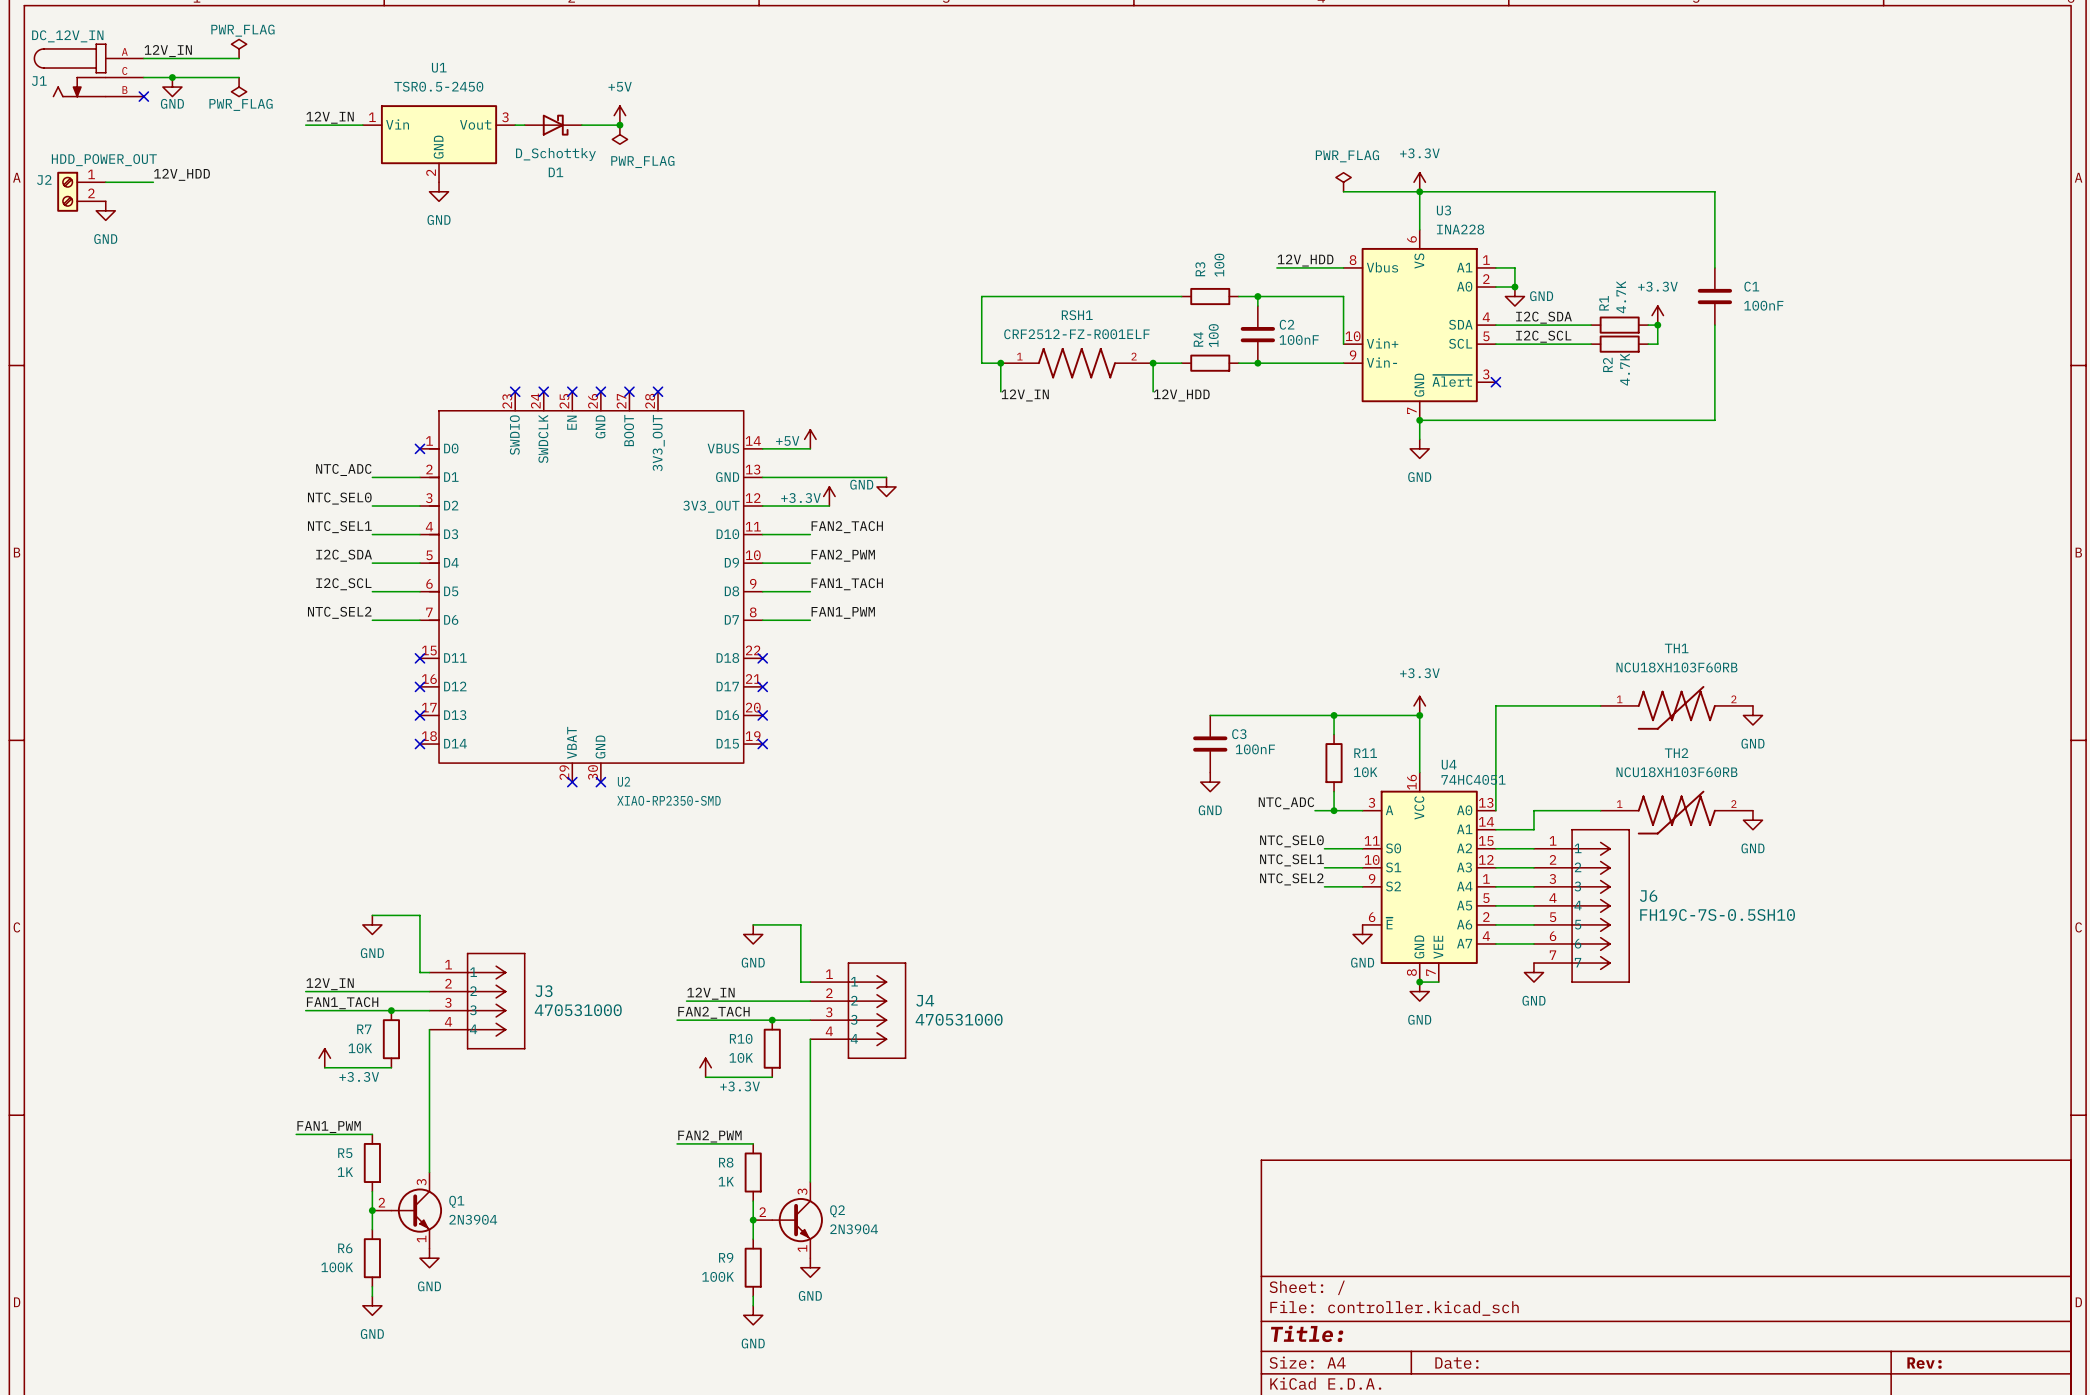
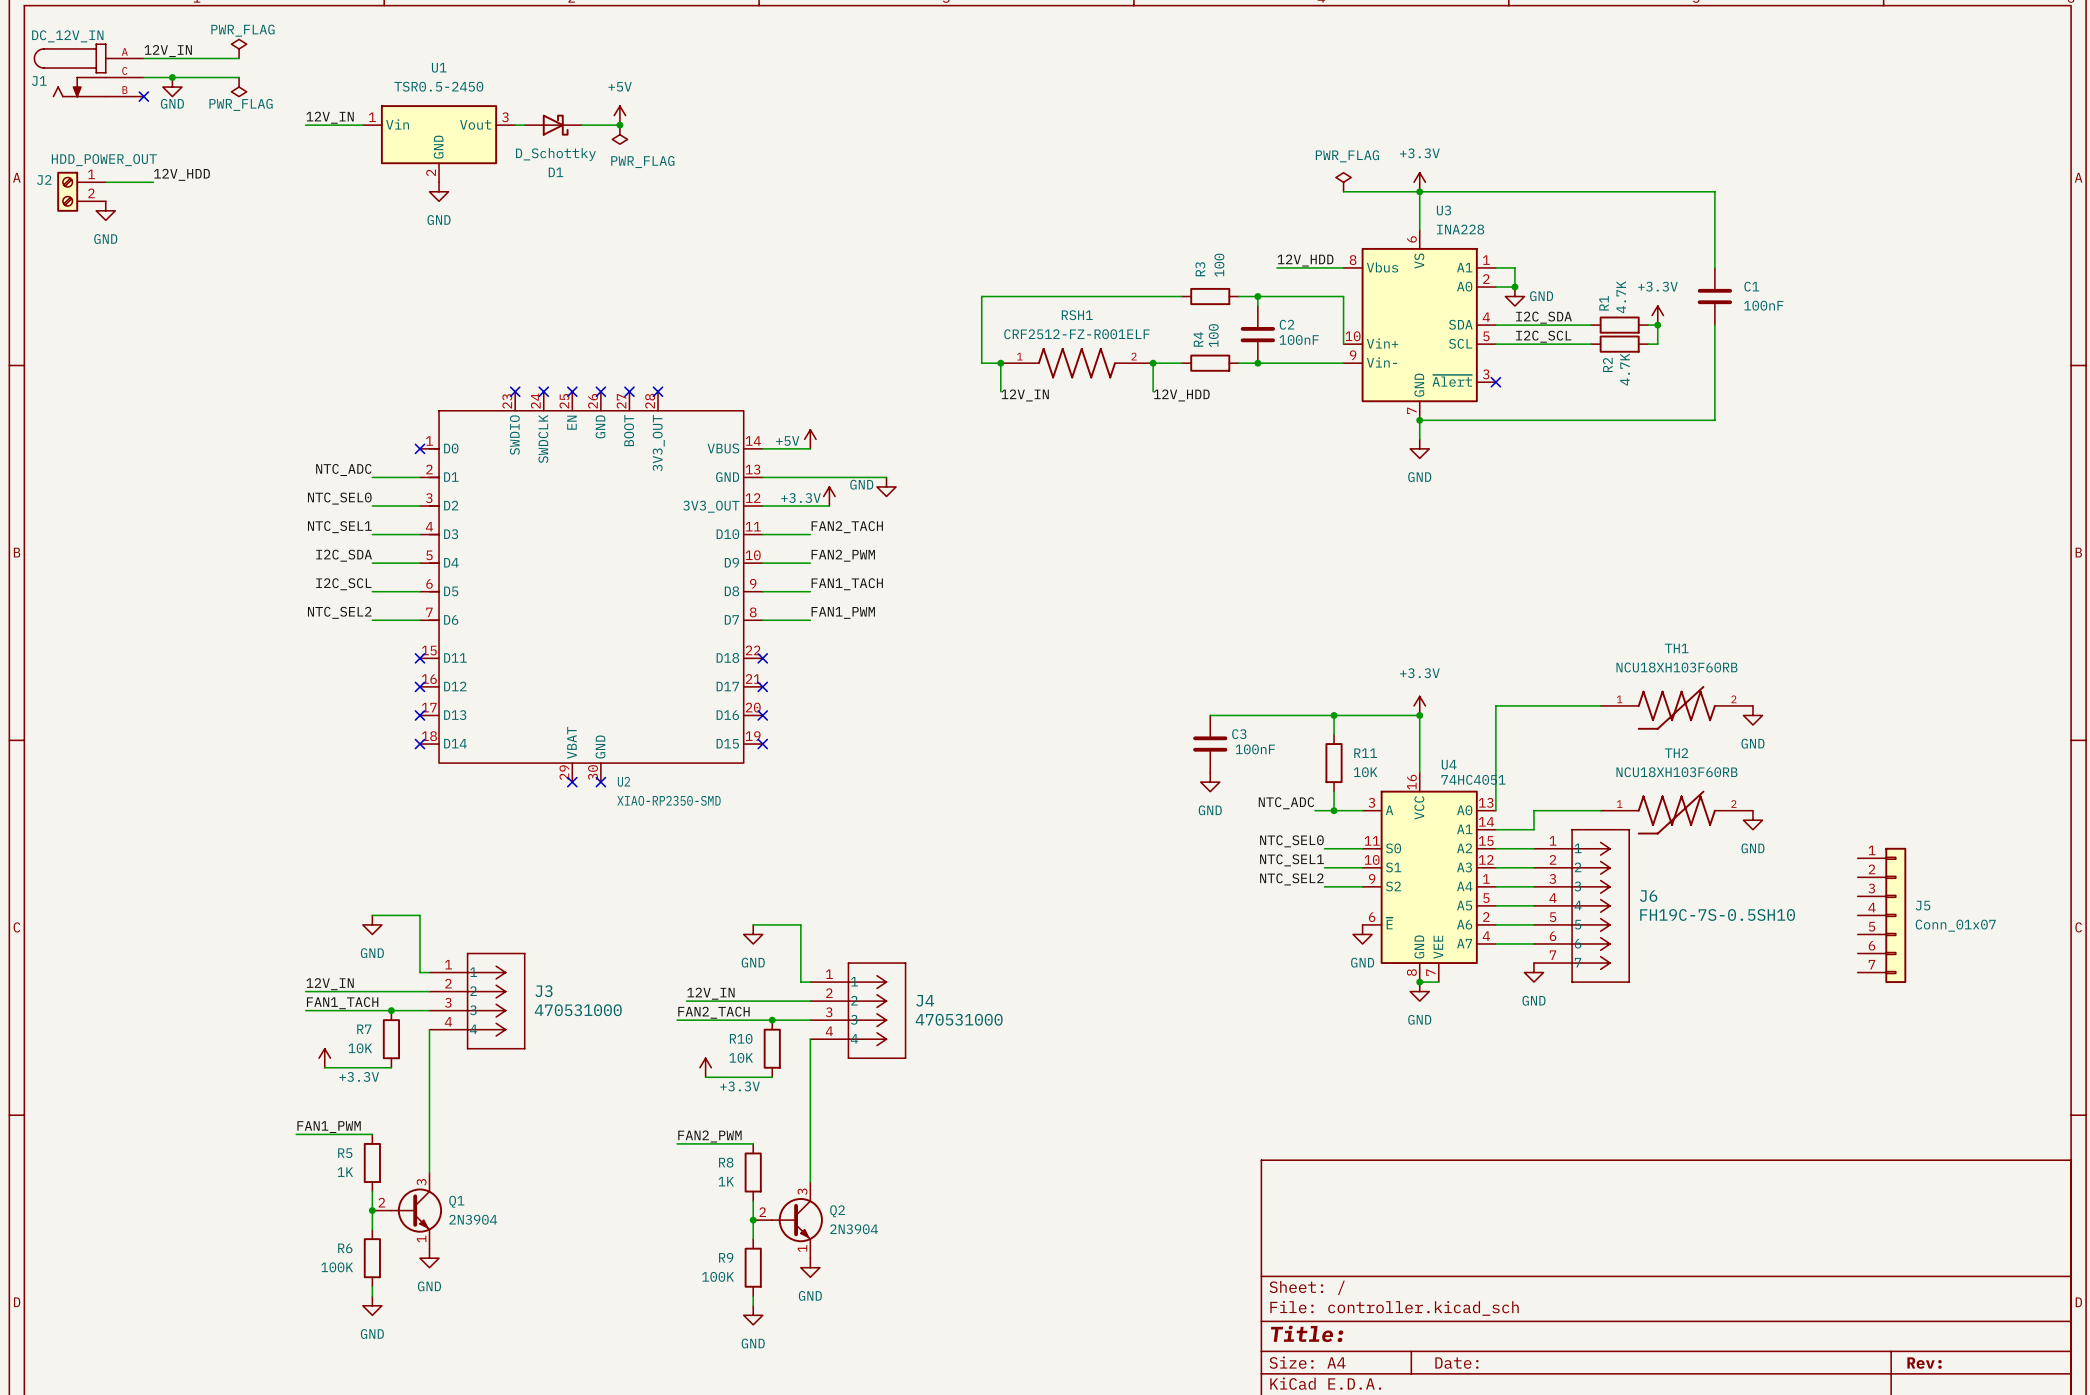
J5: none -> Conn_01x07 (1881, 915)

